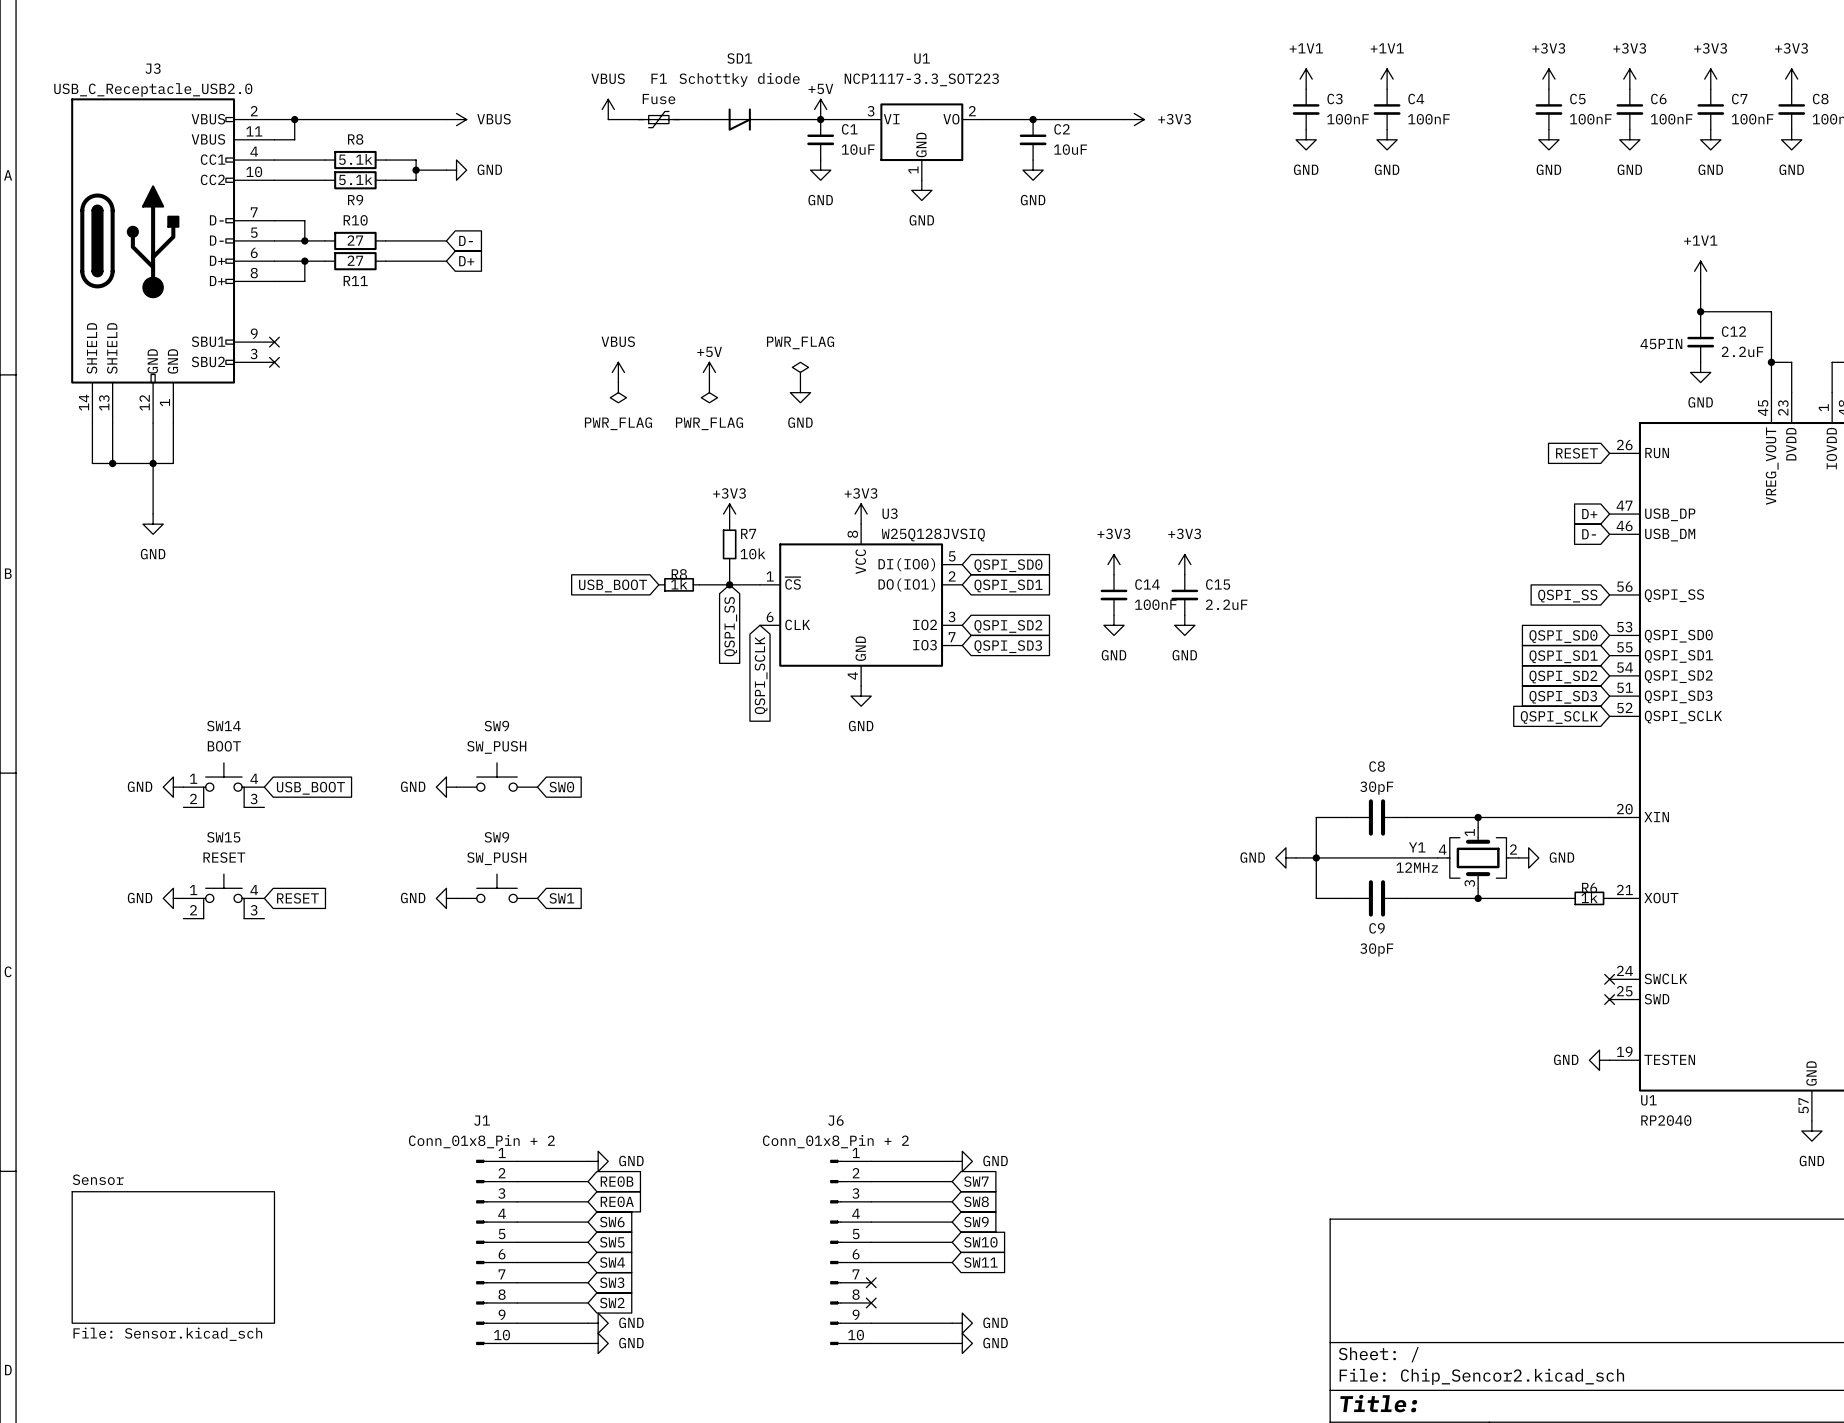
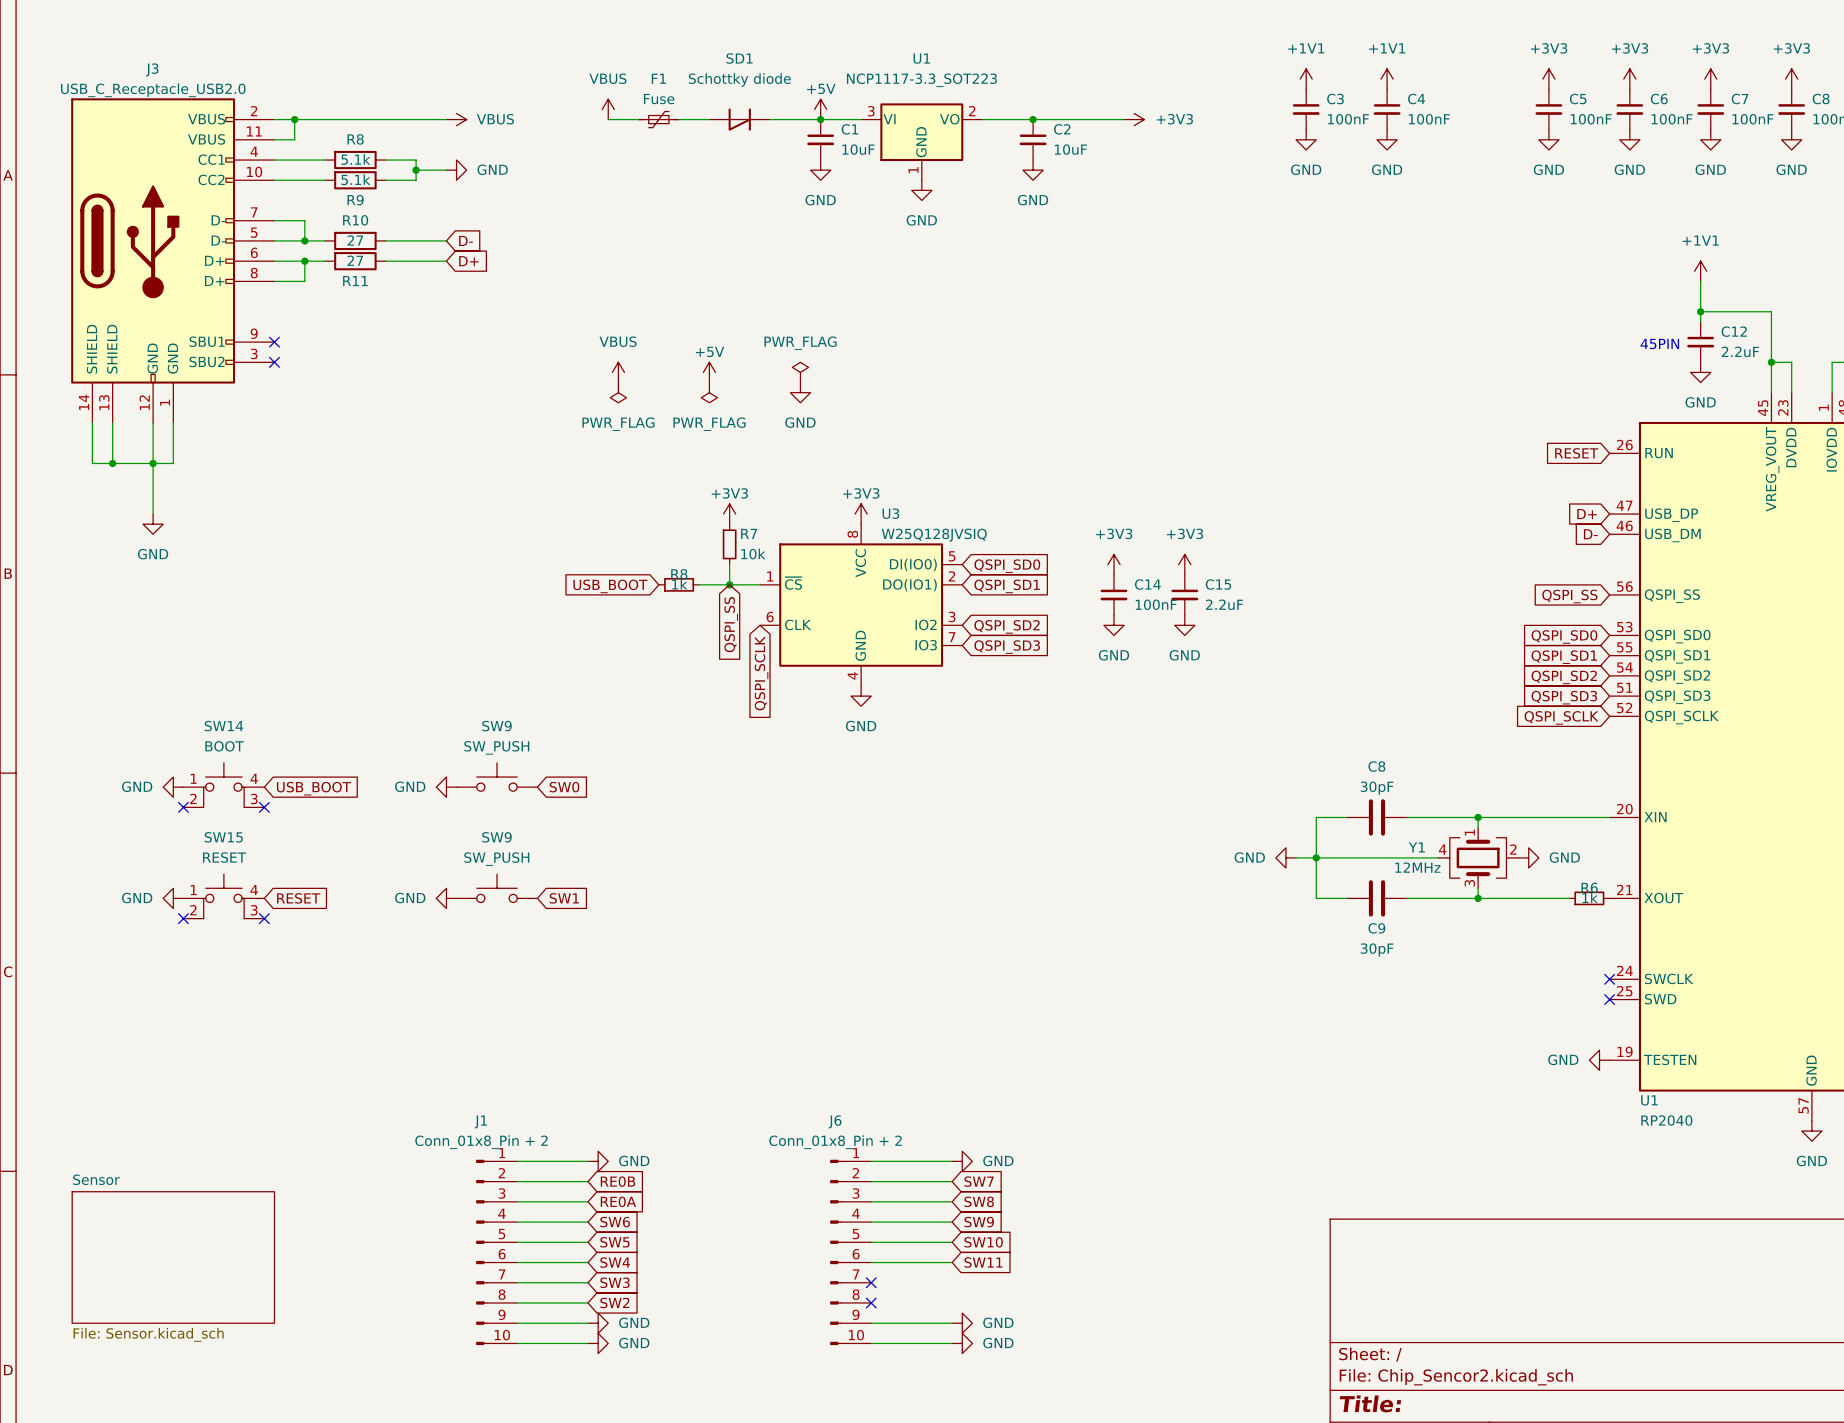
no-connect mark: none -> (183, 807)
no-connect mark: none -> (264, 807)
no-connect mark: none -> (183, 918)
no-connect mark: none -> (264, 918)

